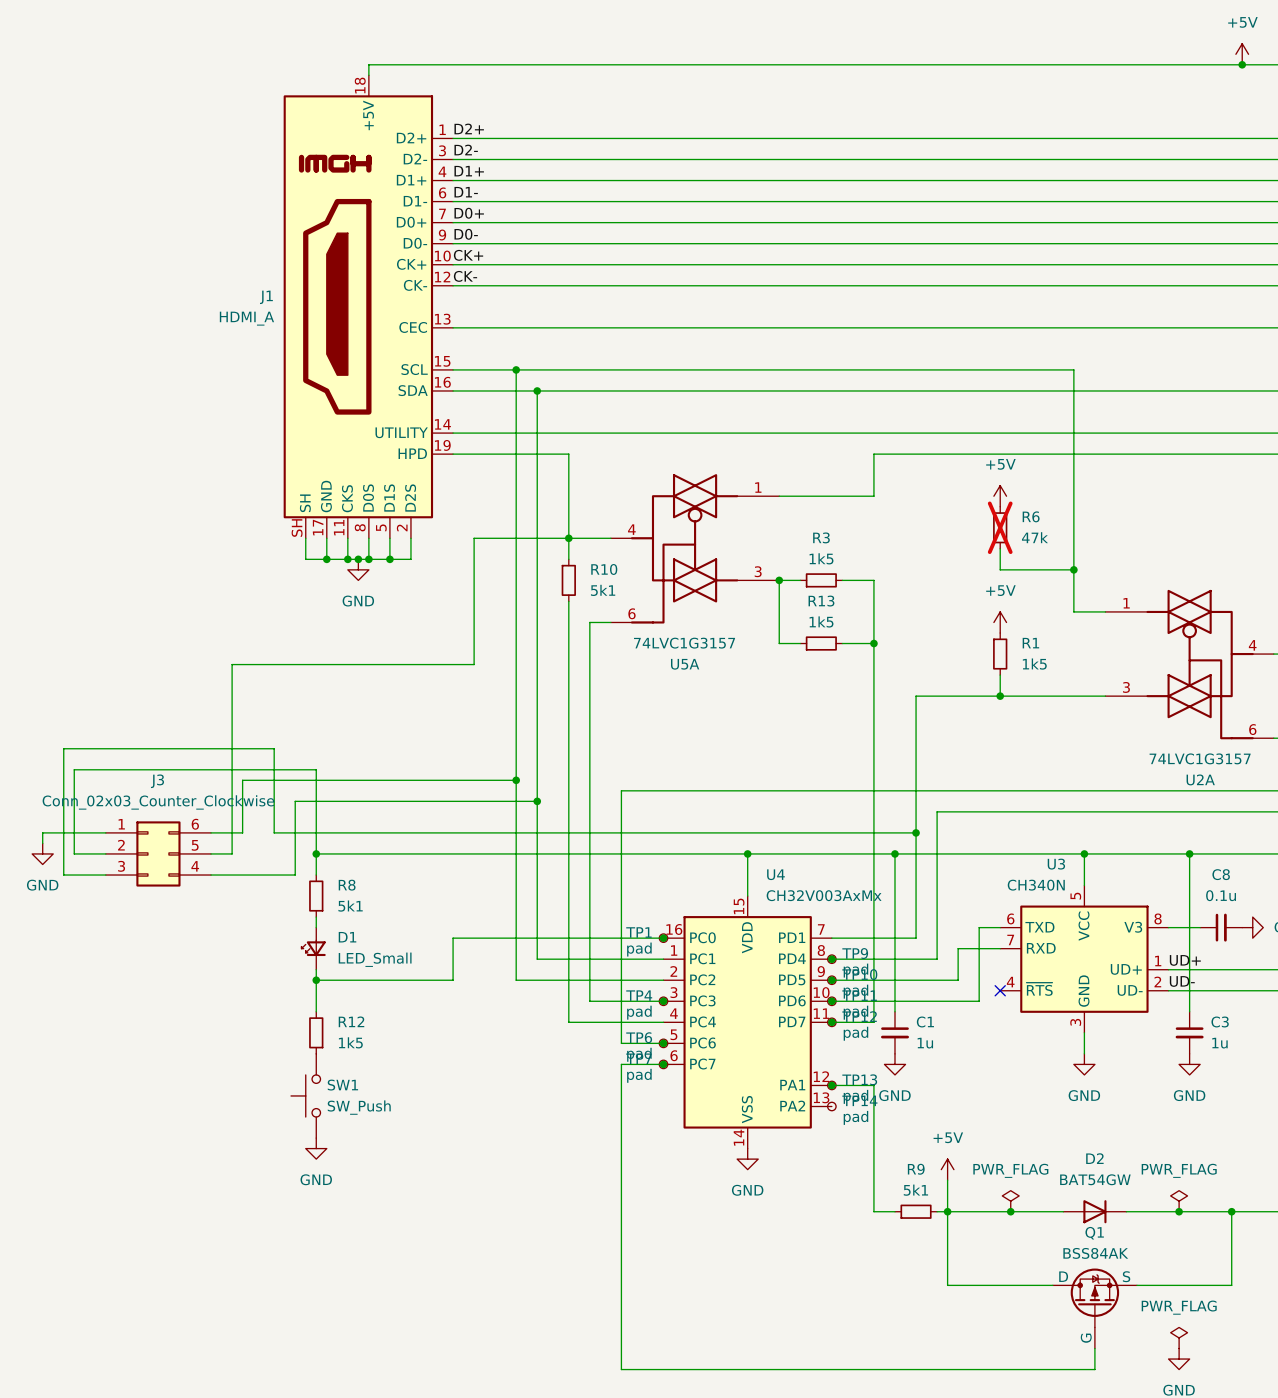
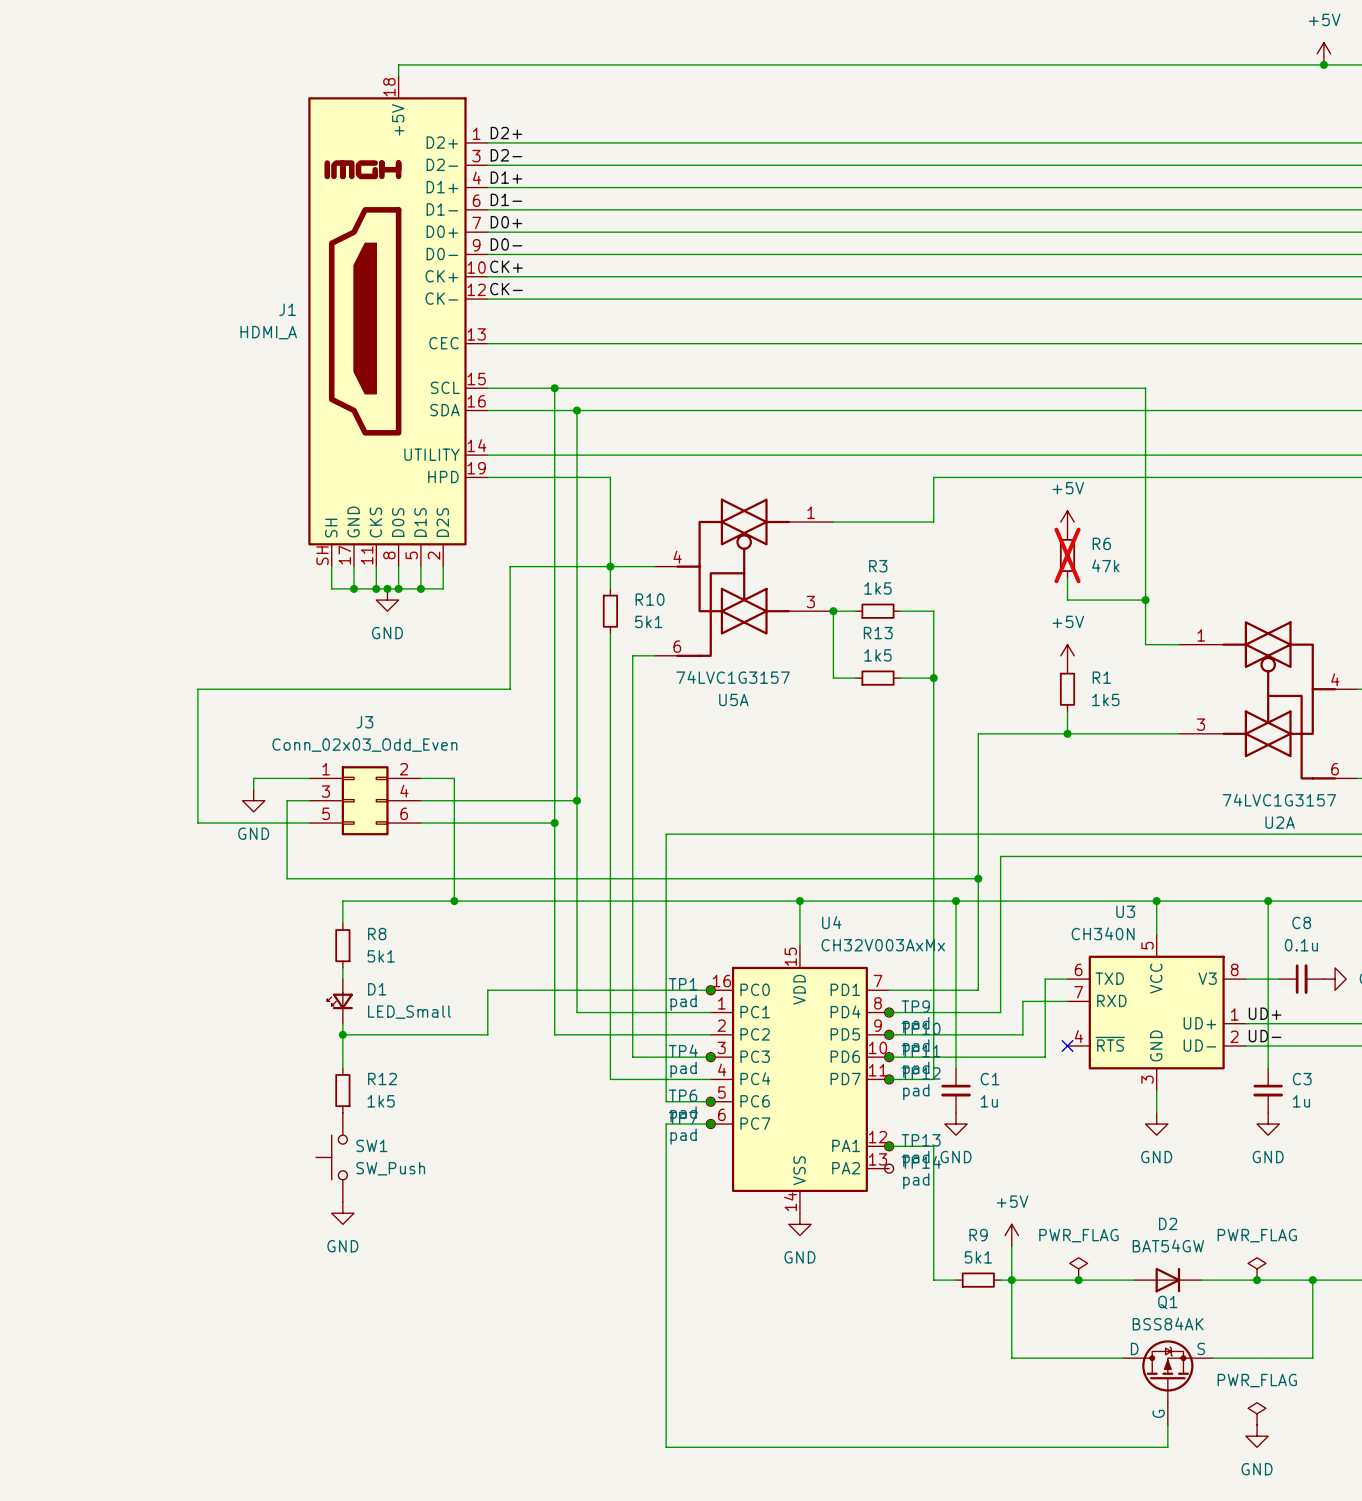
wire: (474, 654) (474, 664) (232, 664) (232, 738) -> (510, 689) (197, 689) (197, 823) (264, 823)
wire: none -> (253, 778) (309, 778)
wire: none -> (420, 778) (454, 778) (454, 901)
wire: (232, 748) (232, 853) (211, 853) -> none
power symbol: none -> GND (253, 800)
wire: none -> (420, 800) (576, 800)
wire: (242, 780) (242, 832) (211, 832) -> none
wire: (537, 801) (295, 801) (295, 875) (211, 875) -> none
junction position: (537, 801) -> (576, 800)
J3 value: Conn_02x03_Counter_Clockwise (158, 802) -> Conn_02x03_Odd_Even (364, 745)
J3 pin number: 6 (195, 824) -> 2 (403, 769)
wire: (105, 832) (42, 832) (42, 843) -> none
wire: (274, 832) (274, 748) (63, 748) (63, 875) (105, 875) -> (298, 878) (287, 878) (287, 800) (309, 800)
J3 pin number: 2 (121, 845) -> 3 (325, 791)
J3 pin number: 5 (195, 845) -> 4 (404, 791)
power symbol: GND (42, 853) -> none
wire: (105, 853) (74, 853) (74, 769) (316, 769) (316, 853) -> none
J3 position: (158, 853) -> (365, 800)
junction: (316, 853) -> none
junction: none -> (454, 901)
J3 pin number: 3 (121, 866) -> 5 (326, 813)
J3 pin number: 4 (195, 866) -> 6 (404, 813)

